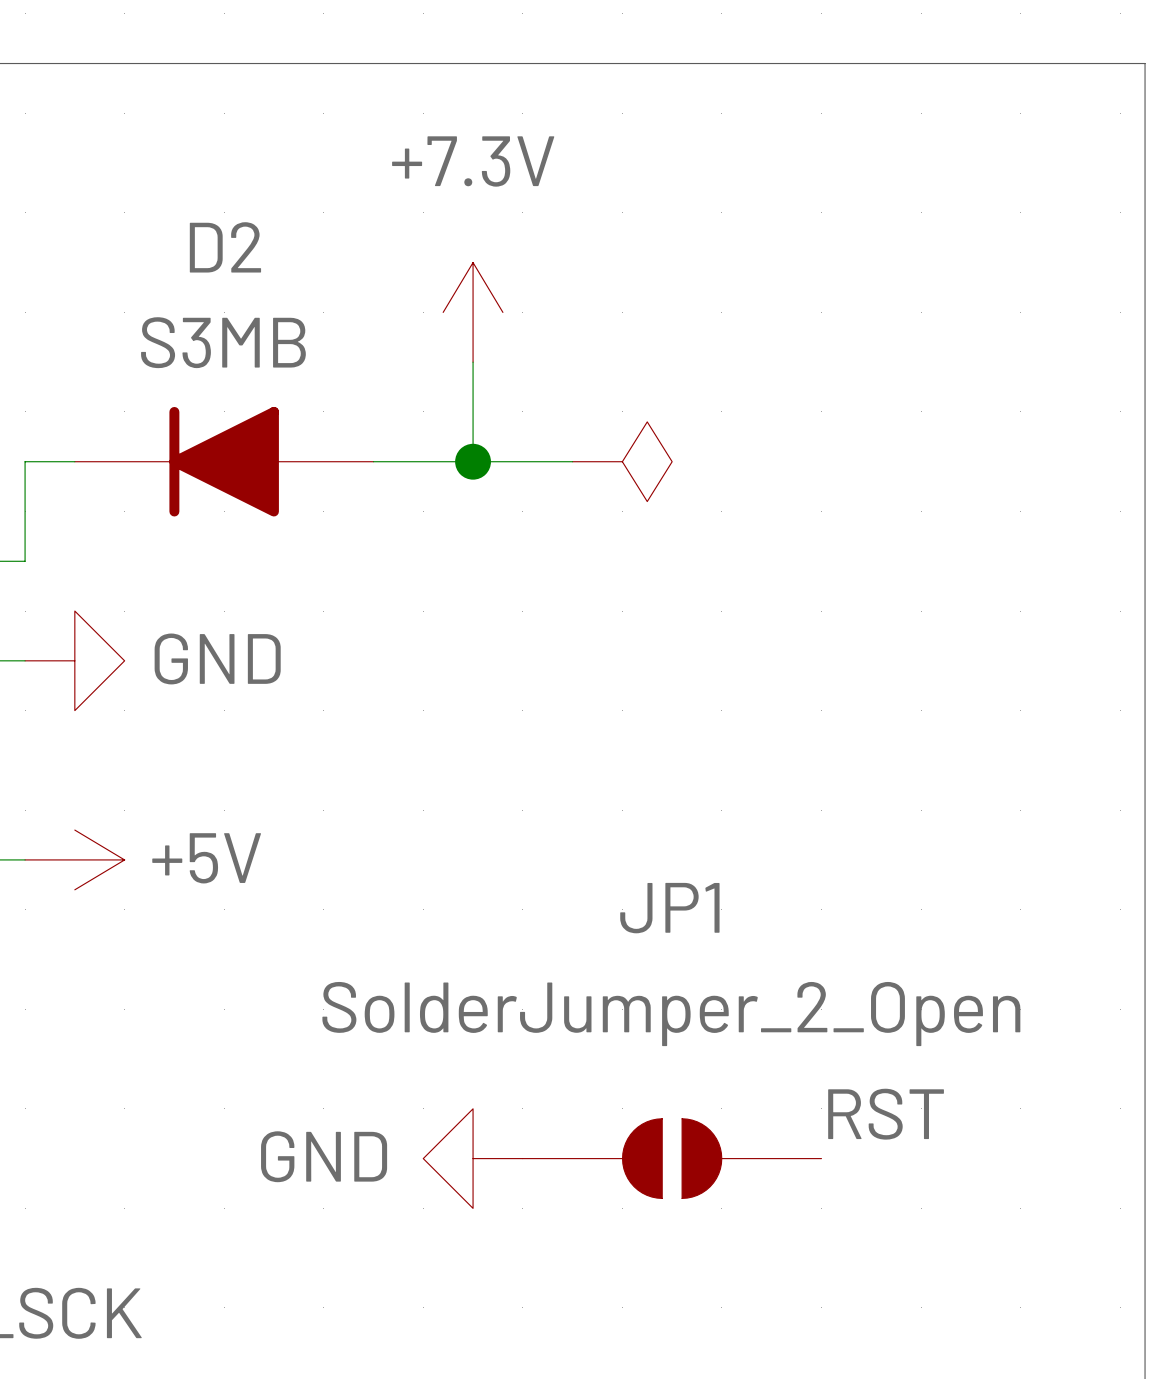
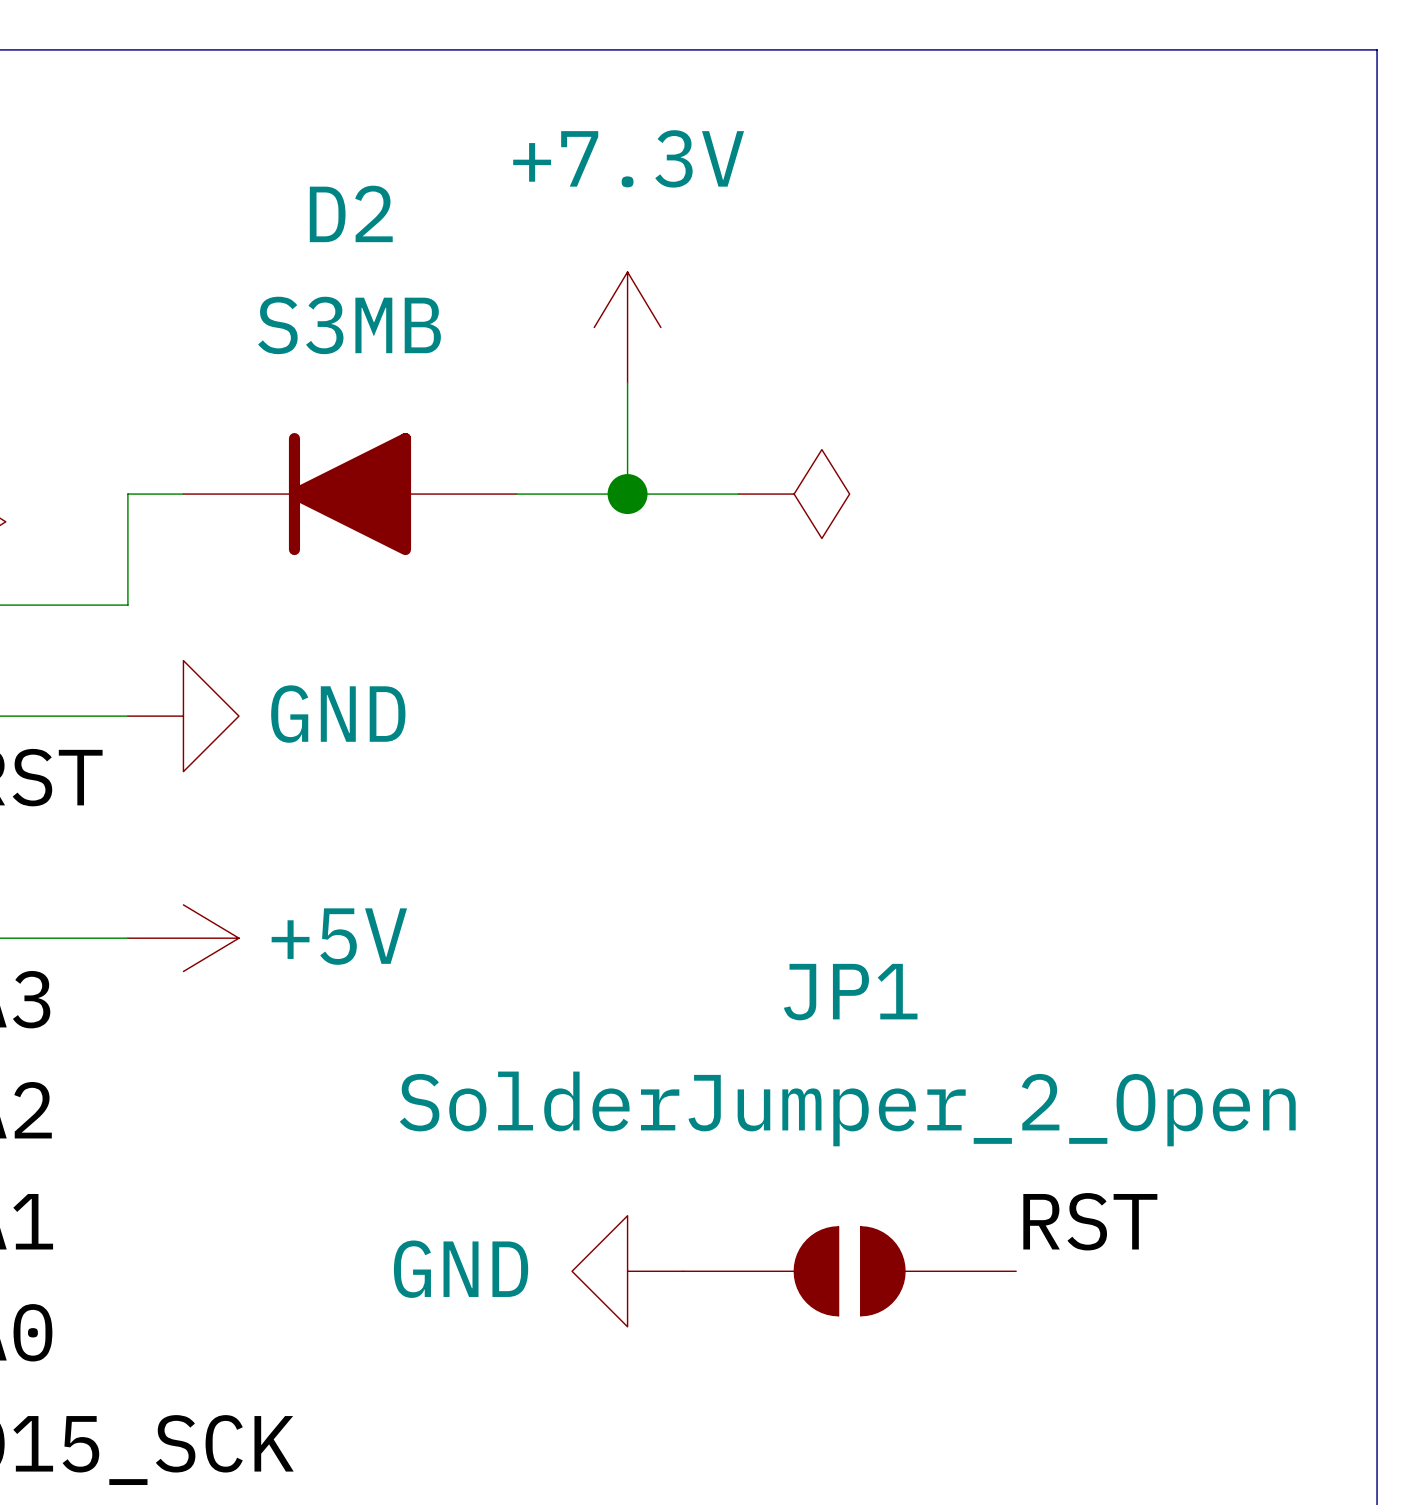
D2 name position: D2 (225, 247) -> D2 (351, 213)
D2 value position: S3MB (223, 342) -> S3MB (349, 325)

